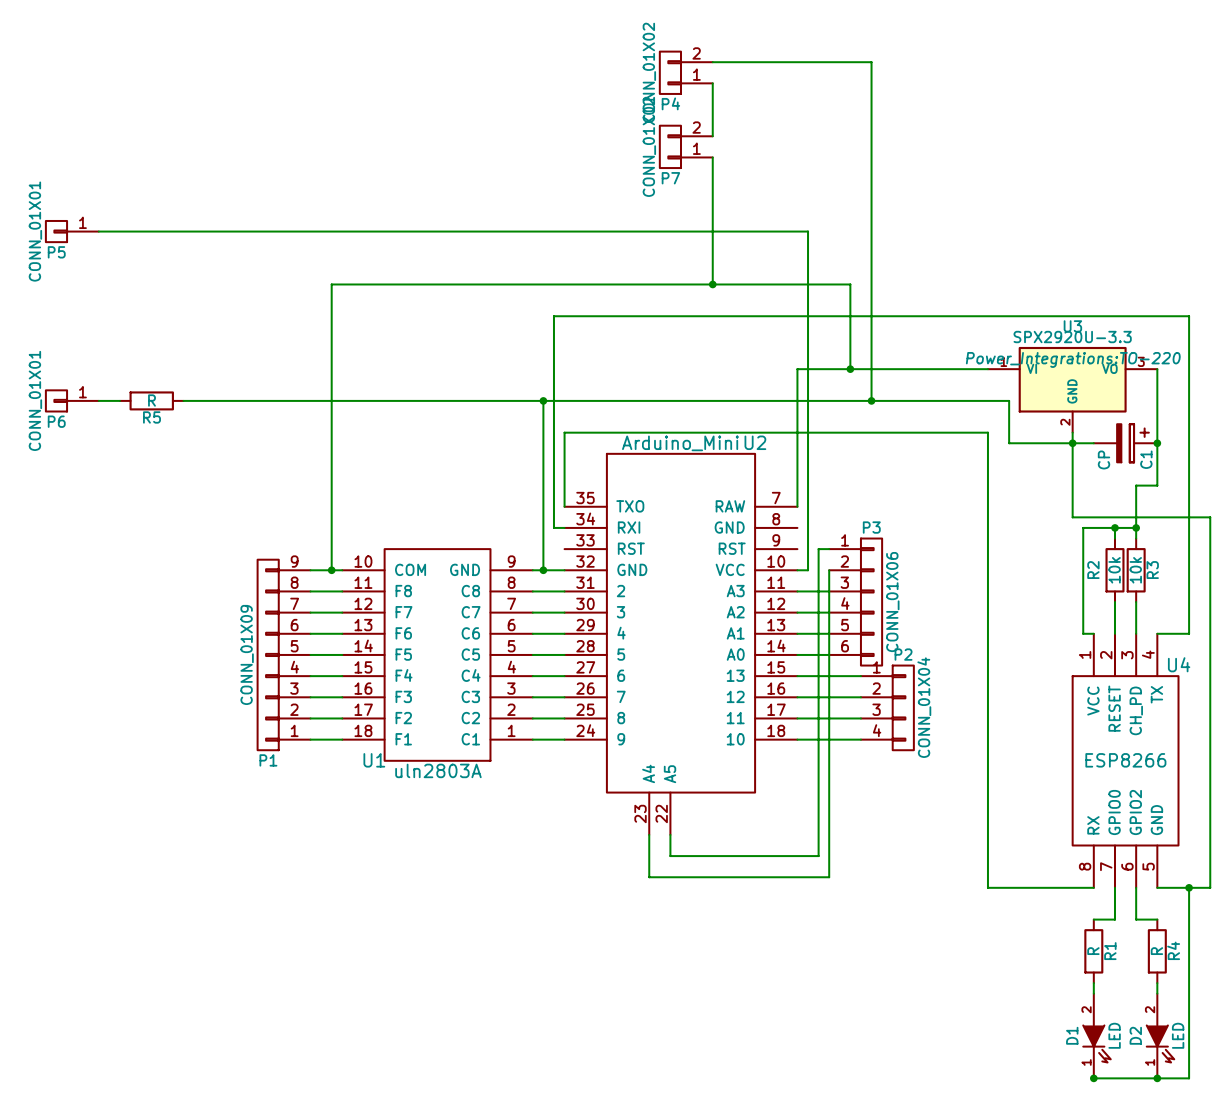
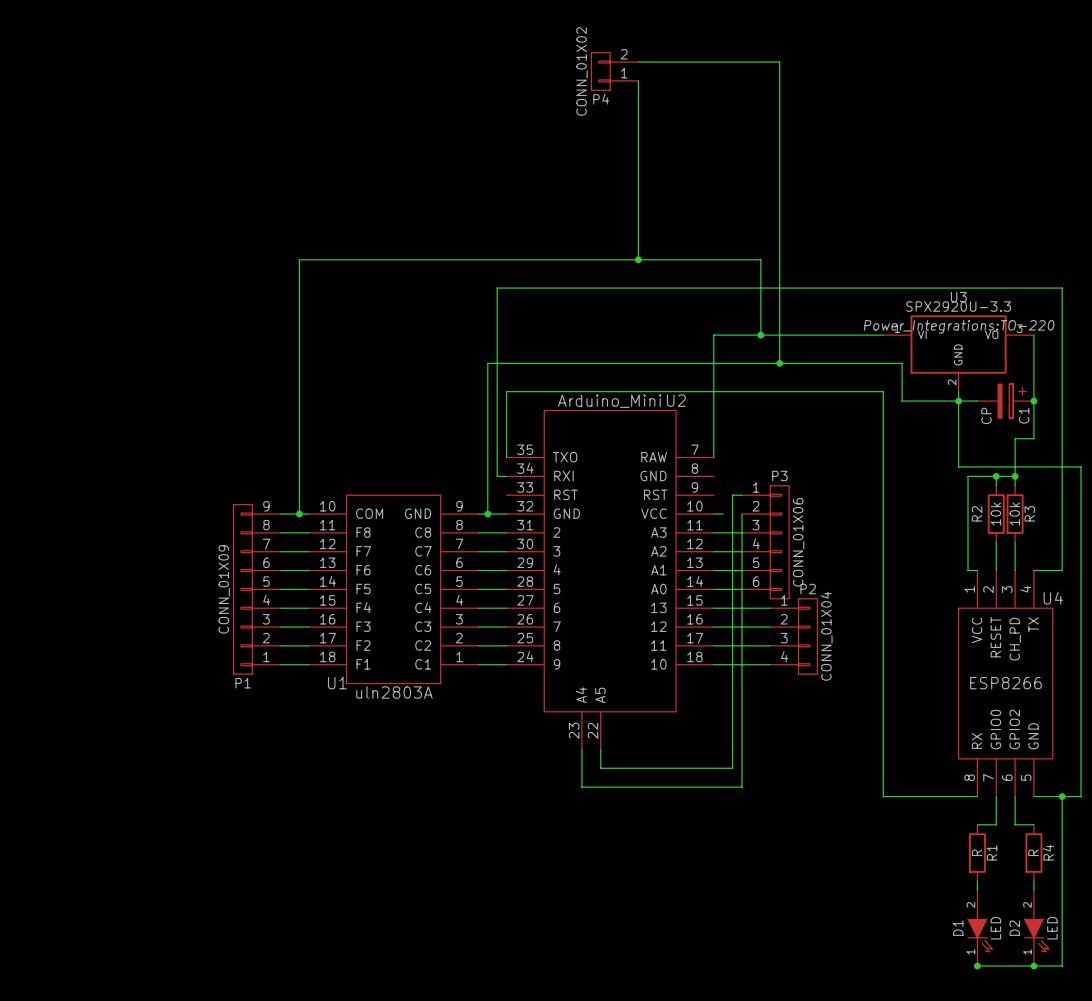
wire: none -> (638, 127) (638, 146)
P7: CONN_01X02 (686, 146) -> none
P5: CONN_01X01 (72, 231) -> none
wire: (98, 231) (808, 231) (808, 570) -> none
P6: CONN_01X01 (72, 400) -> none
wire: (98, 400) (119, 400) -> none
R5: R (151, 400) -> none
wire: (183, 400) (543, 400) -> none
junction: (543, 400) -> none

